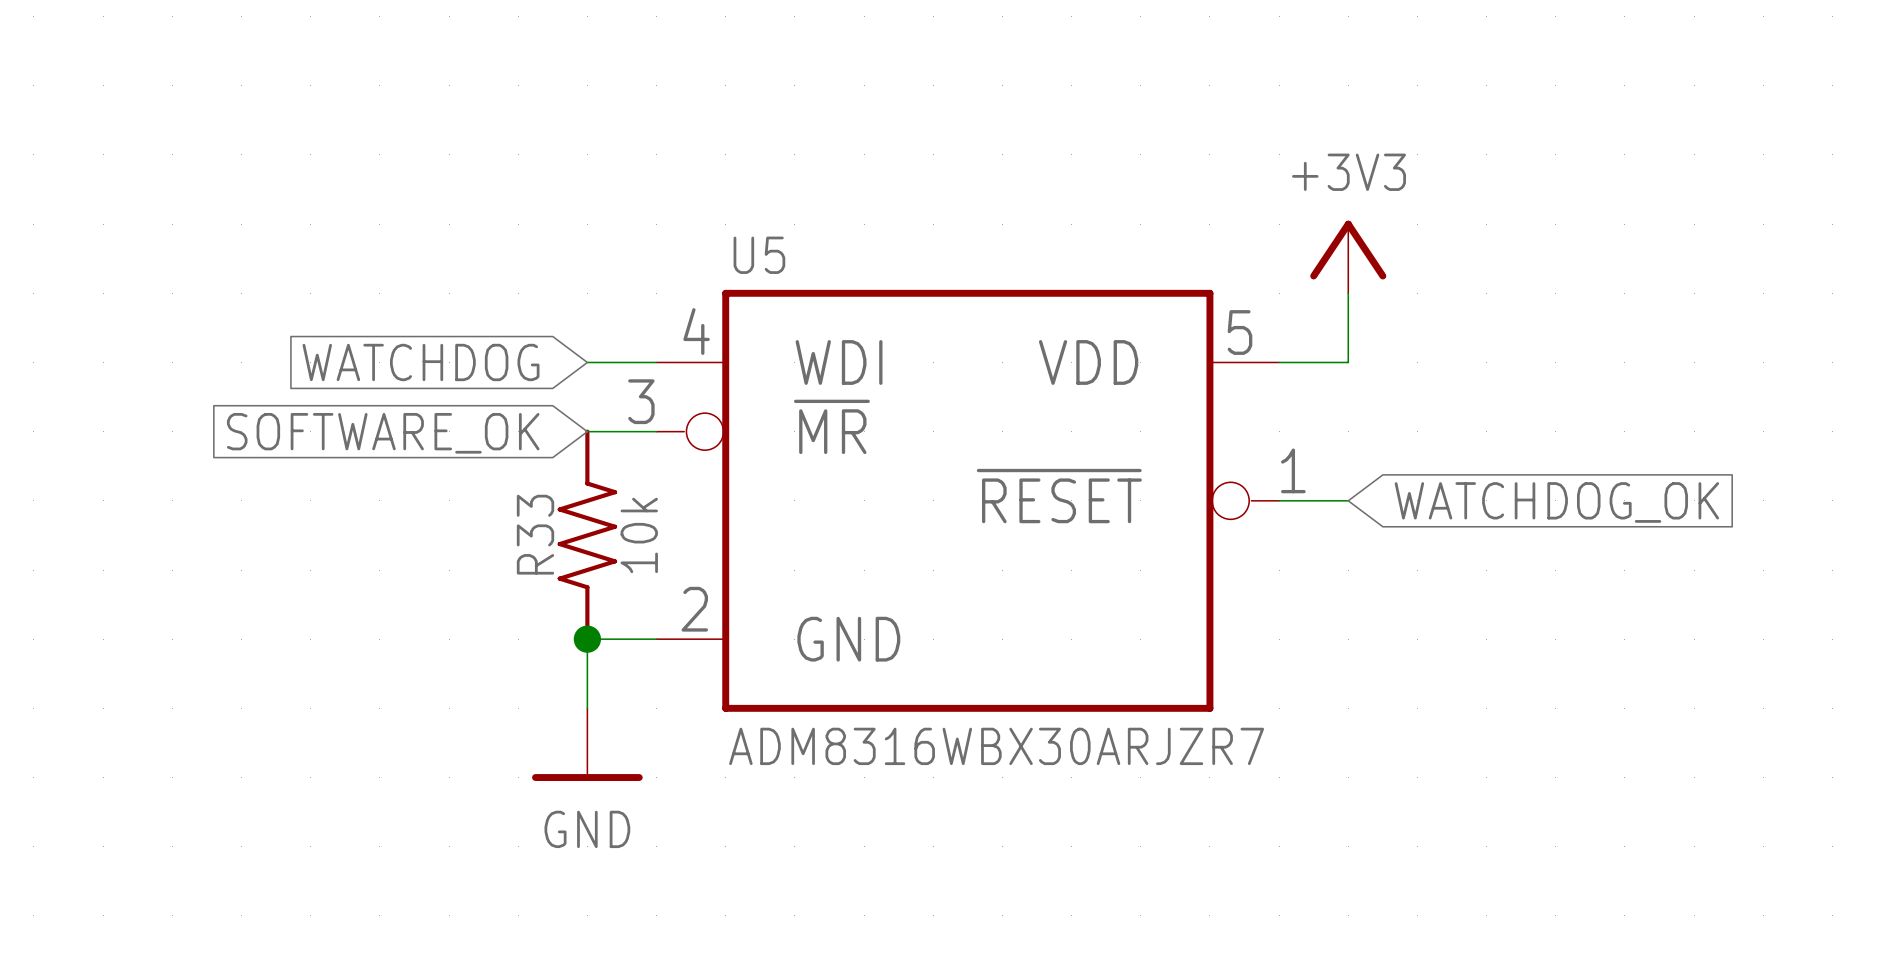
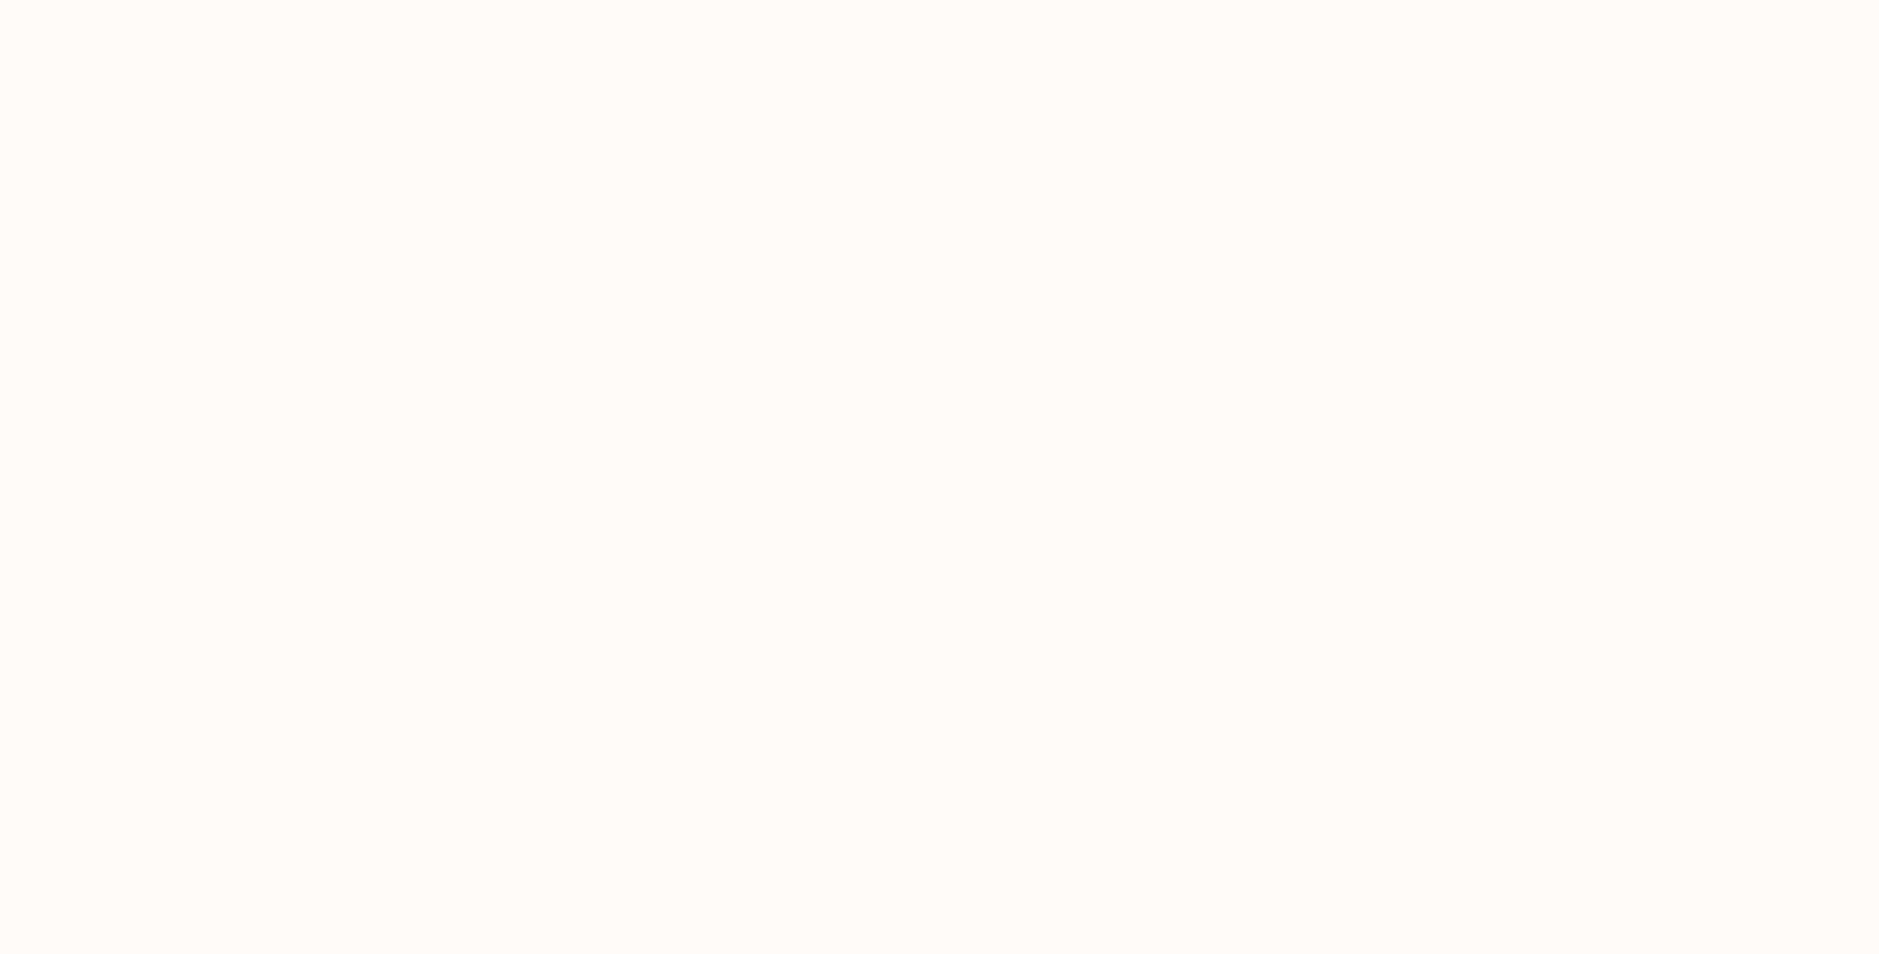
power symbol: +3V3 (1348, 256) -> none
wire: (1348, 293) (1348, 362) (1279, 362) -> none
global label: WATCHDOG (421, 362) -> none
wire: (587, 362) (656, 362) -> none
wire: (587, 431) (656, 431) -> none
global label: SOFTWARE_OK (383, 433) -> none
U5: (967, 500) -> none
wire: (1279, 500) (1348, 500) -> none
global label: WATCHDOG_OK (1556, 502) -> none
R33: (587, 535) -> none
junction: (587, 639) -> none
wire: (656, 639) (587, 639) (587, 708) -> none
power symbol: GND (587, 744) -> none

